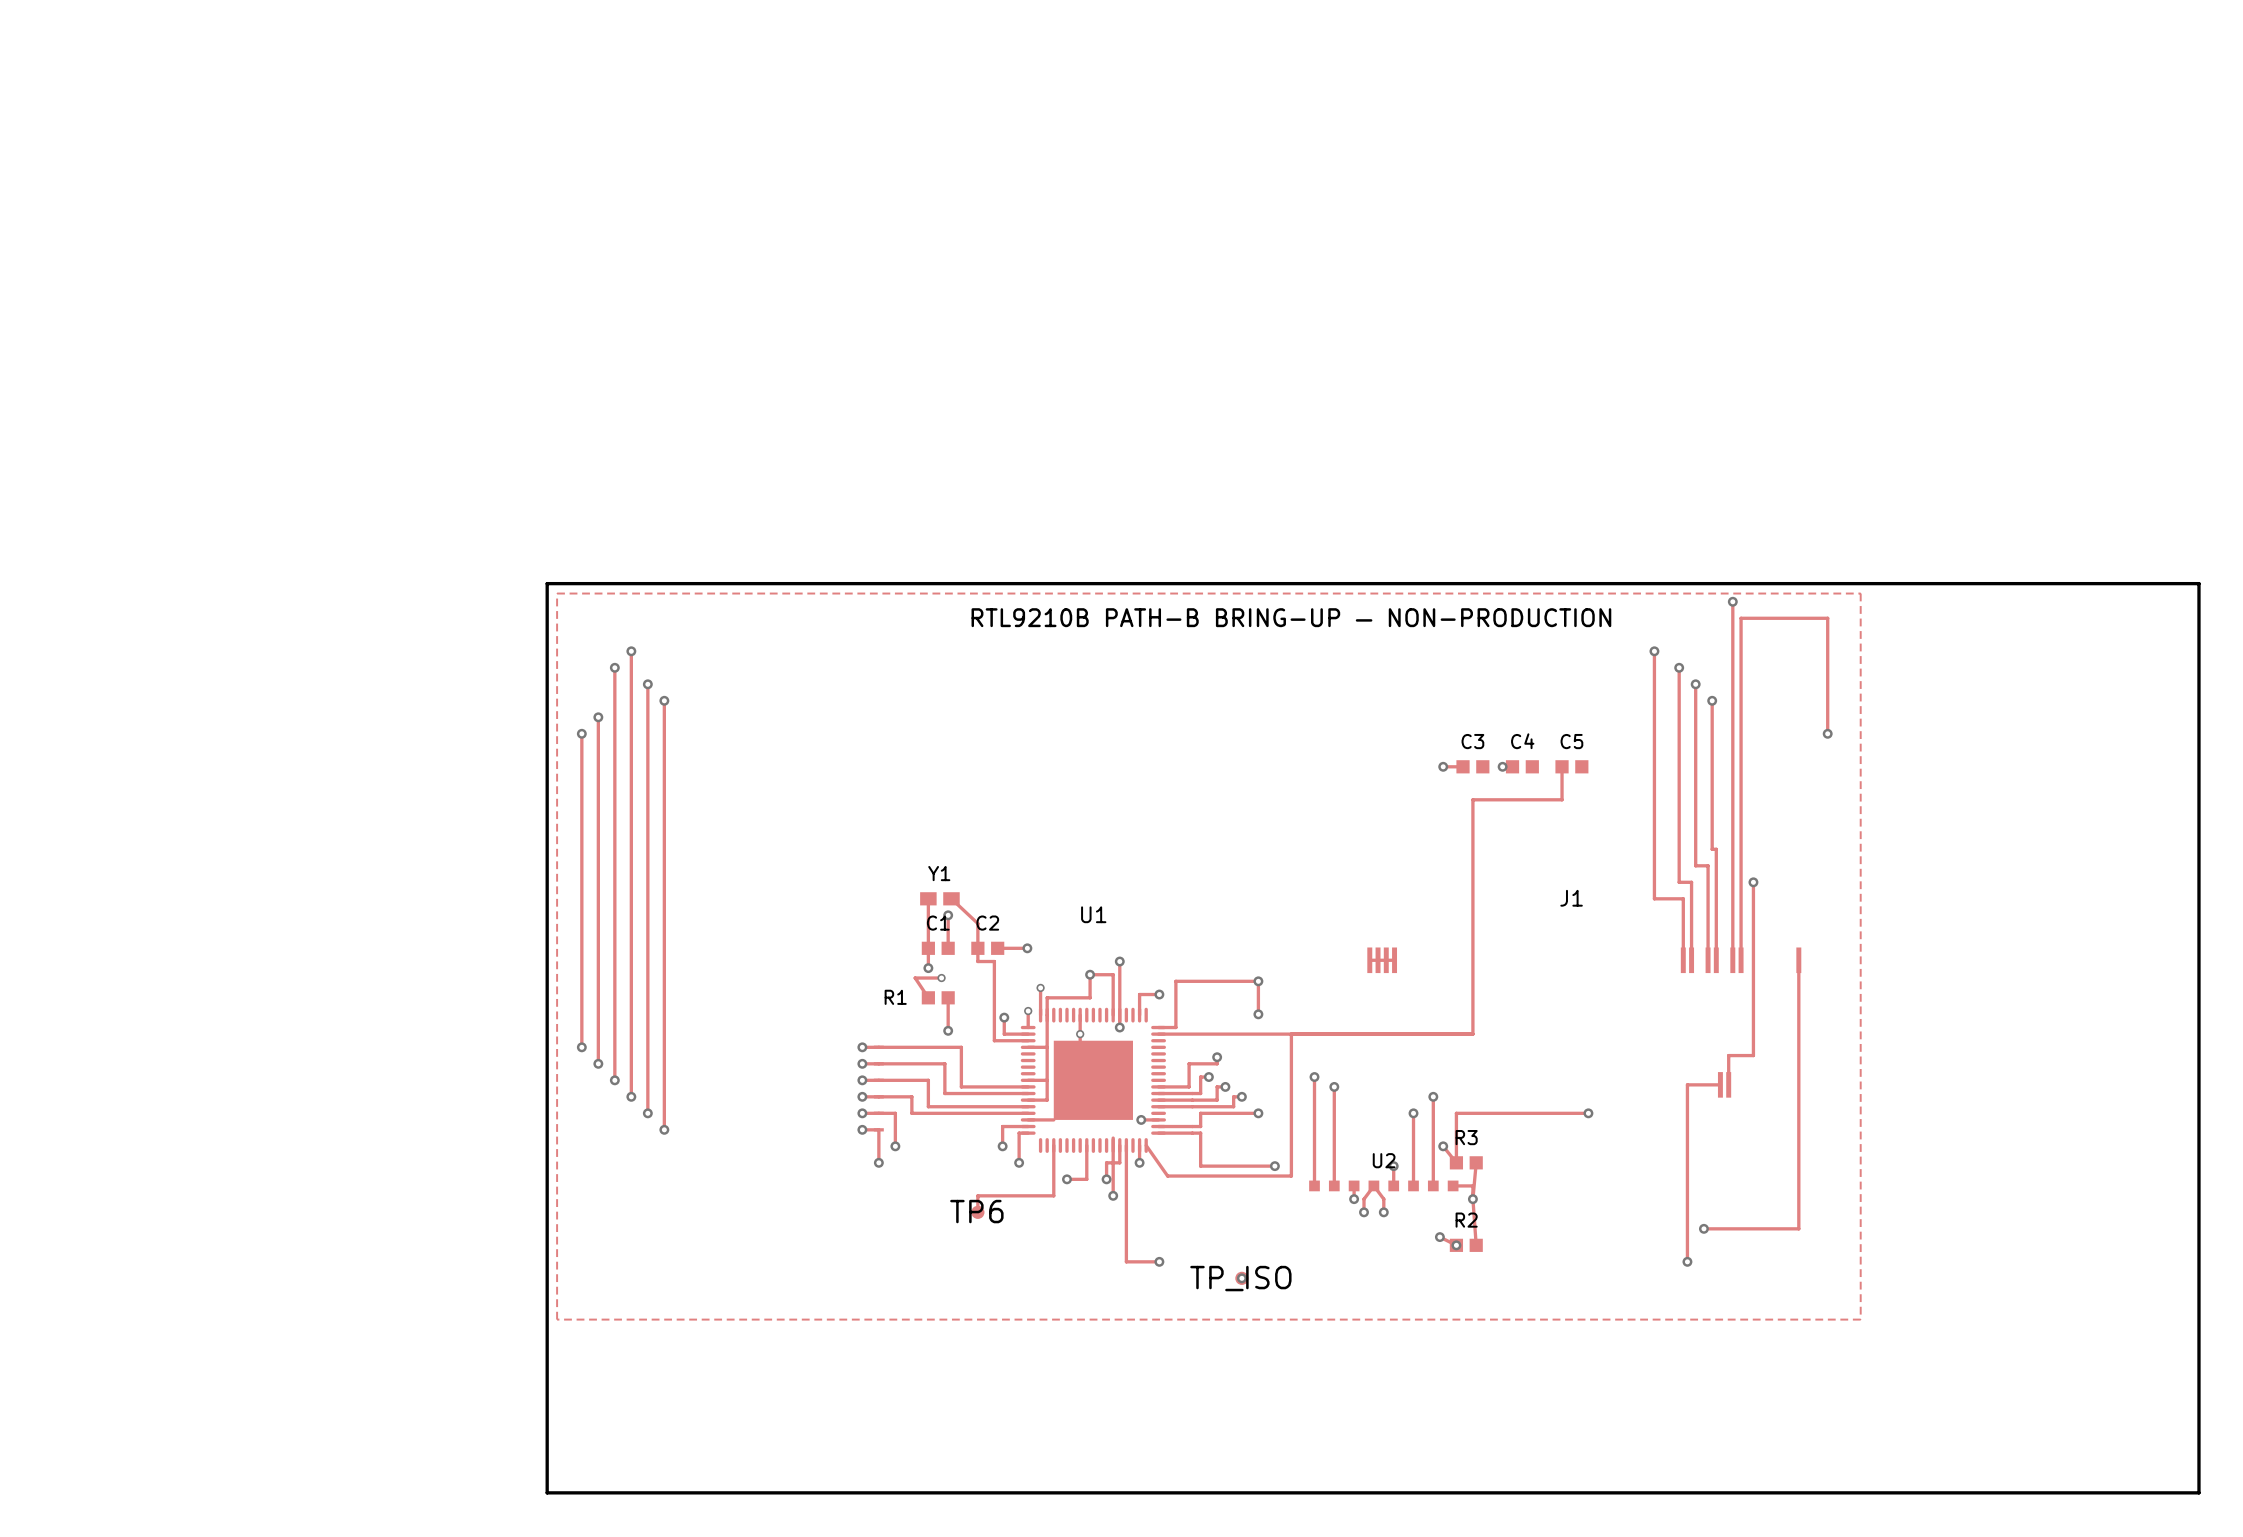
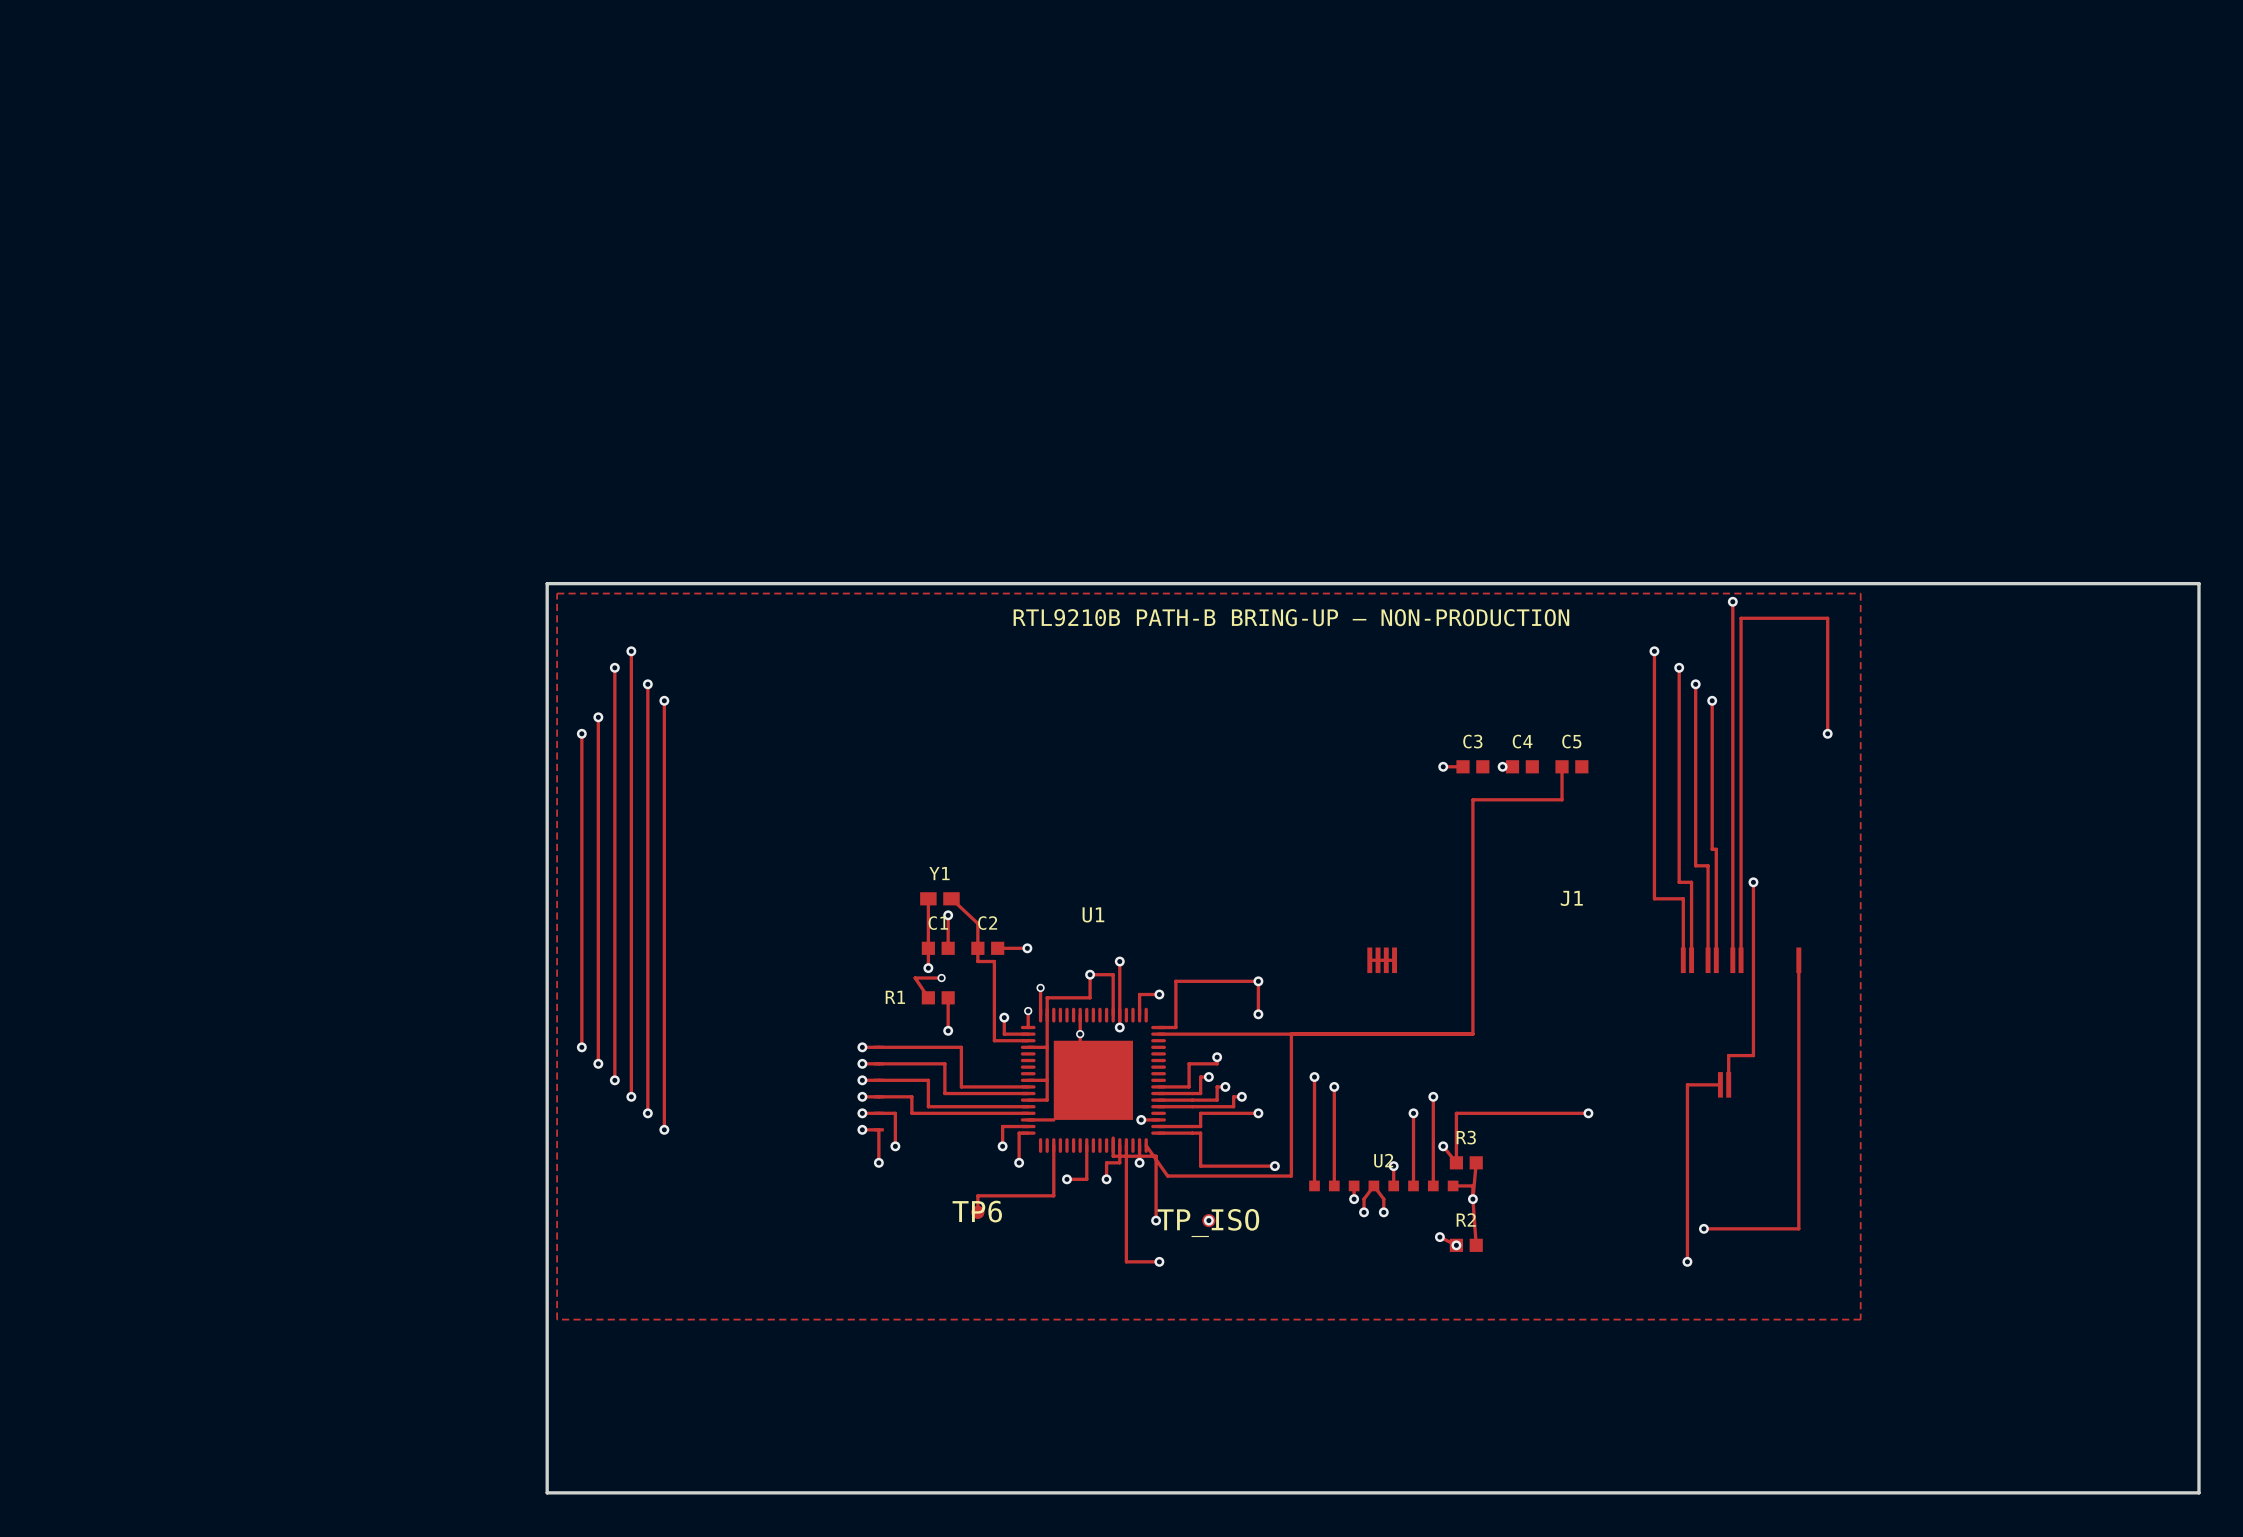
track: (1113, 1156) (1113, 1195) -> (1113, 1156) (1156, 1156) (1156, 1220)
via: (1113, 1195) -> none
via: none -> (1156, 1220)
via: none -> (1208, 1220)
TP_ISO position: (1241, 1278) -> (1208, 1220)
via: (1241, 1278) -> none

